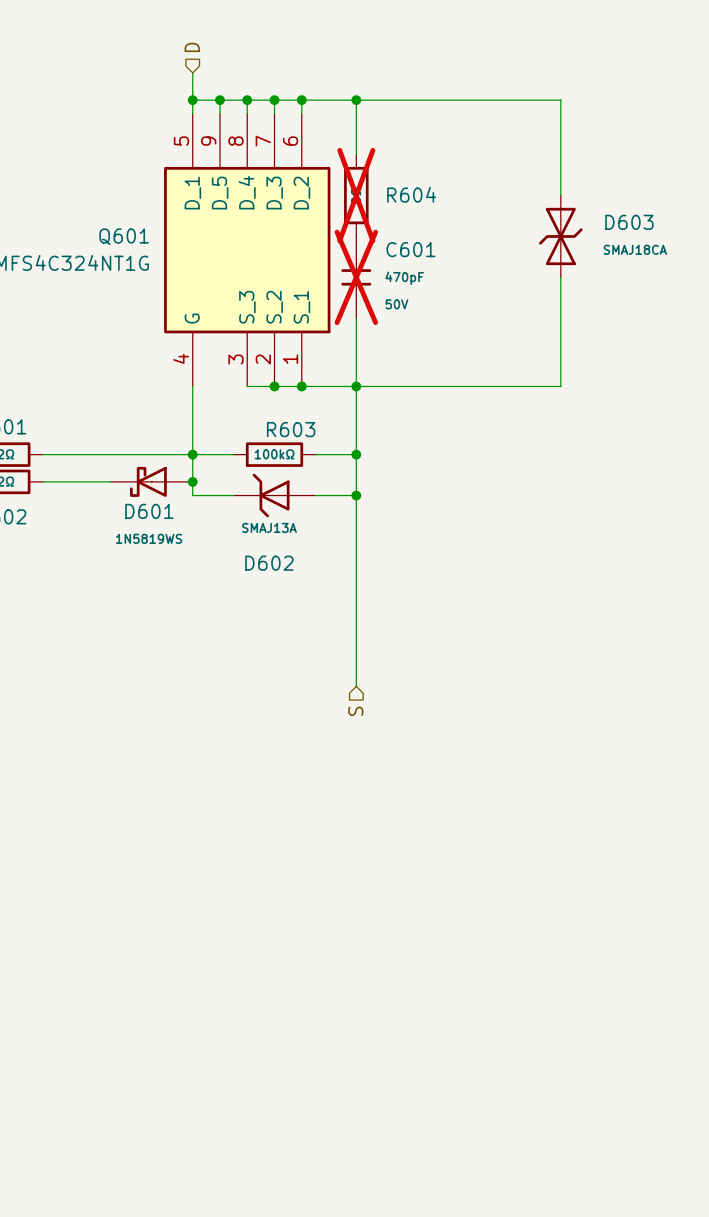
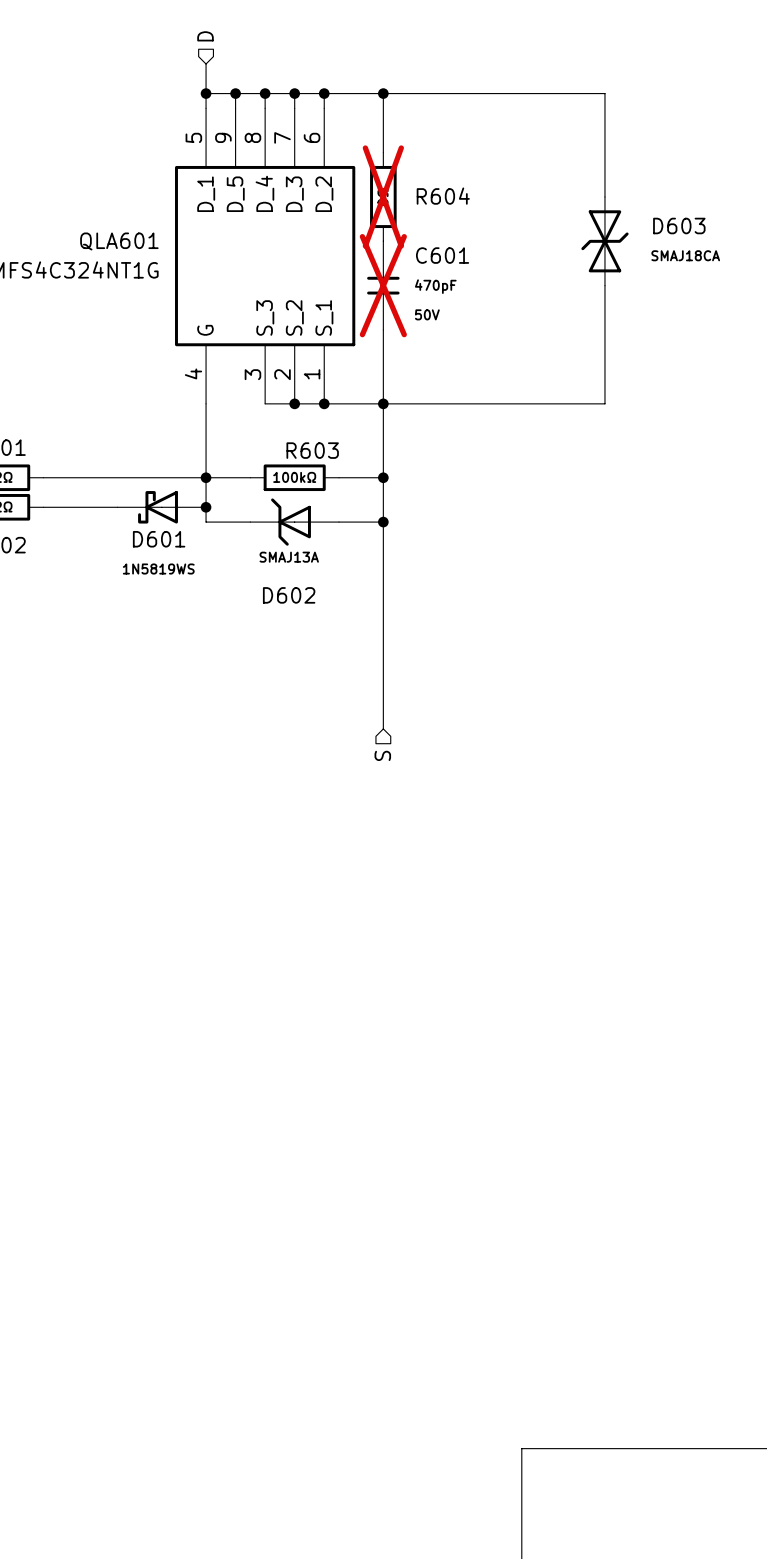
Q601 name: Q601 (124, 236) -> QLA601 (119, 241)

